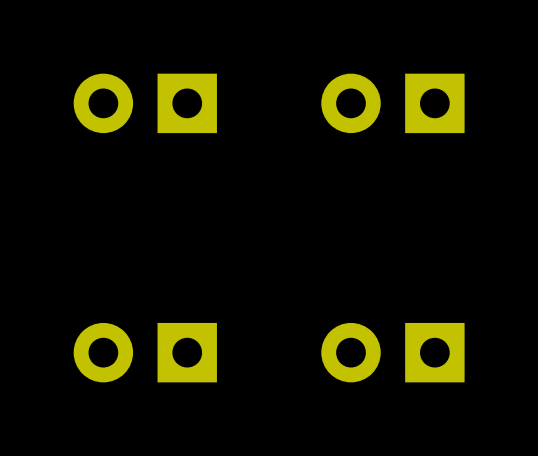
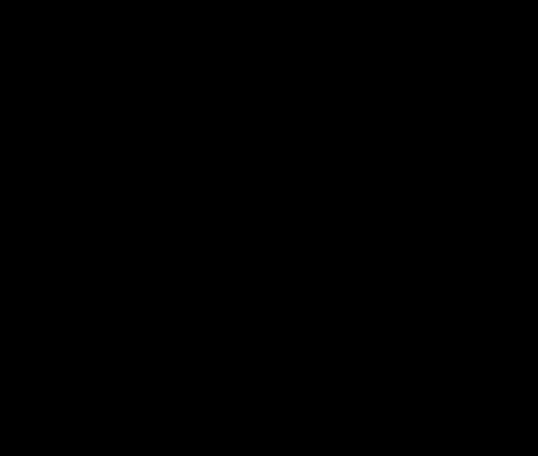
part: (145, 103) -> none
part: (392, 103) -> none
part: (145, 352) -> none
part: (392, 352) -> none

